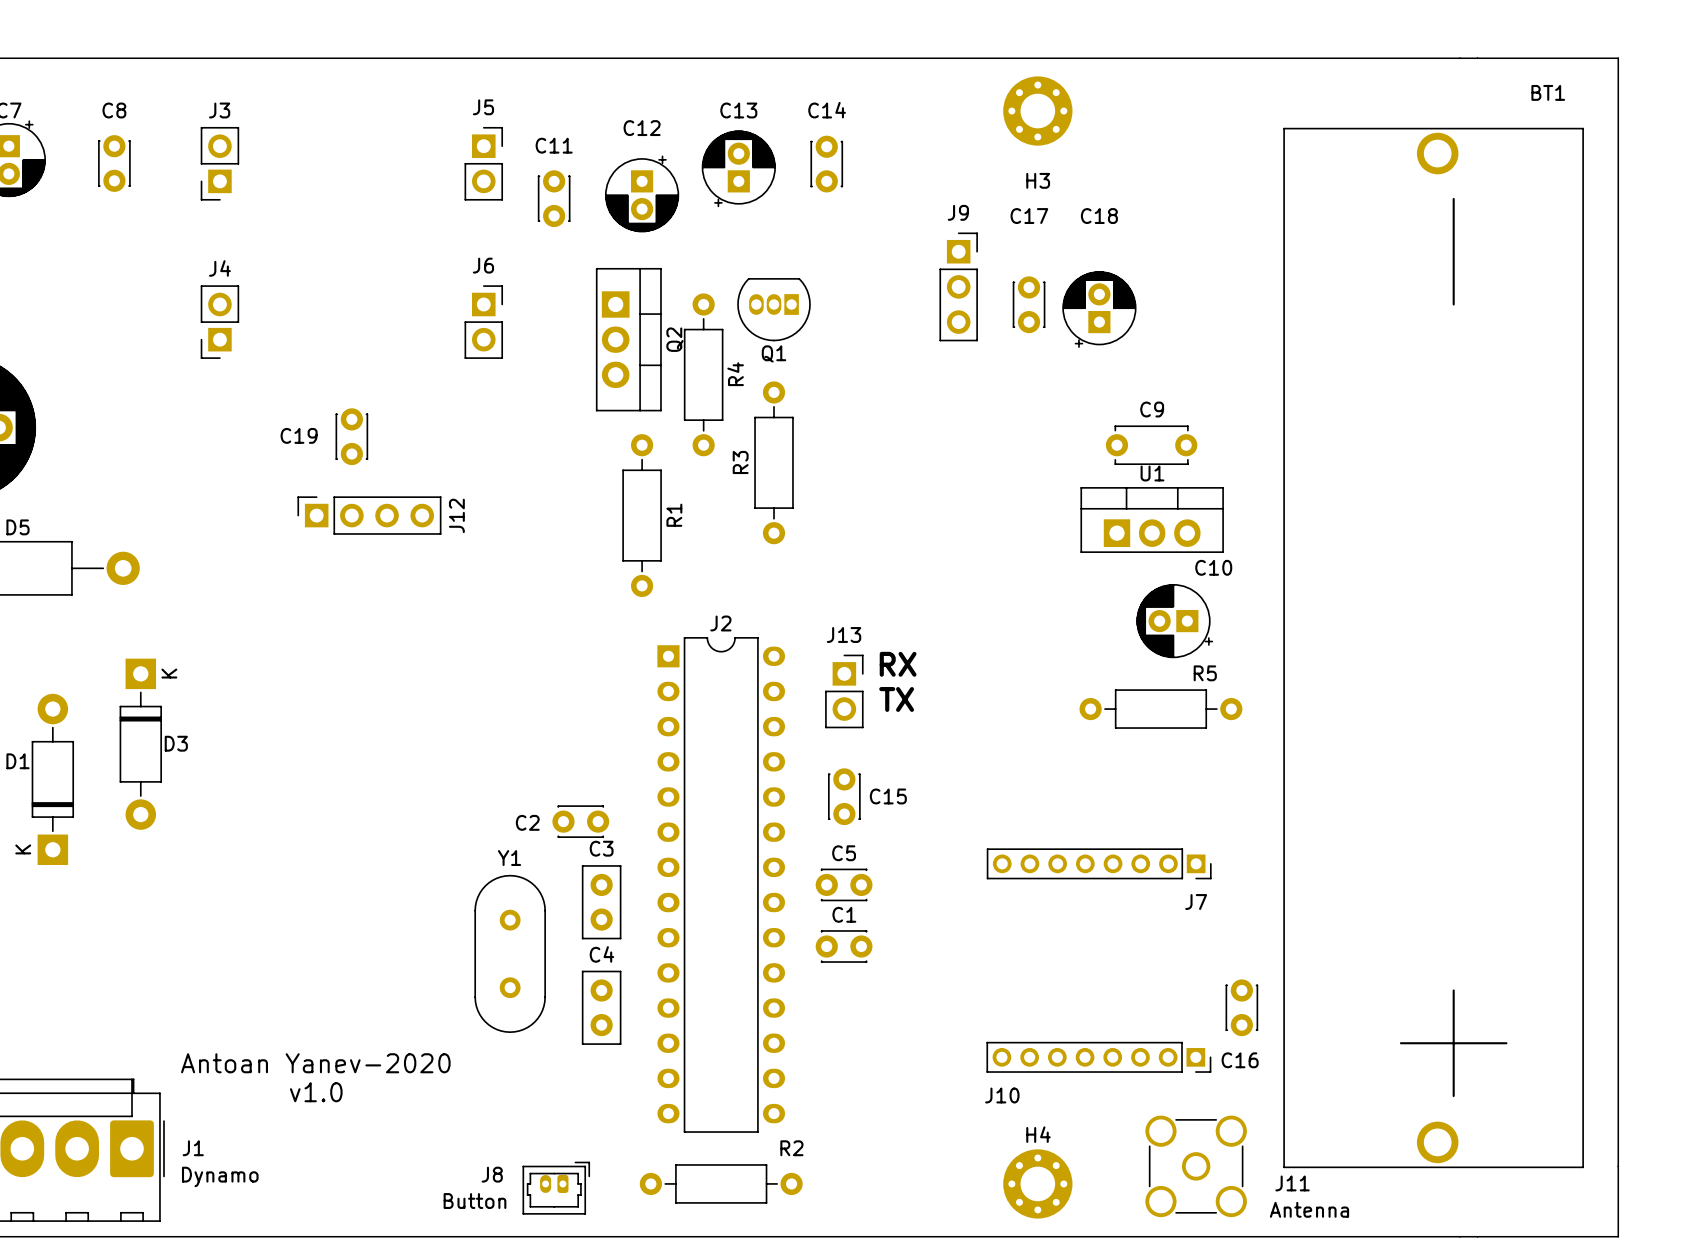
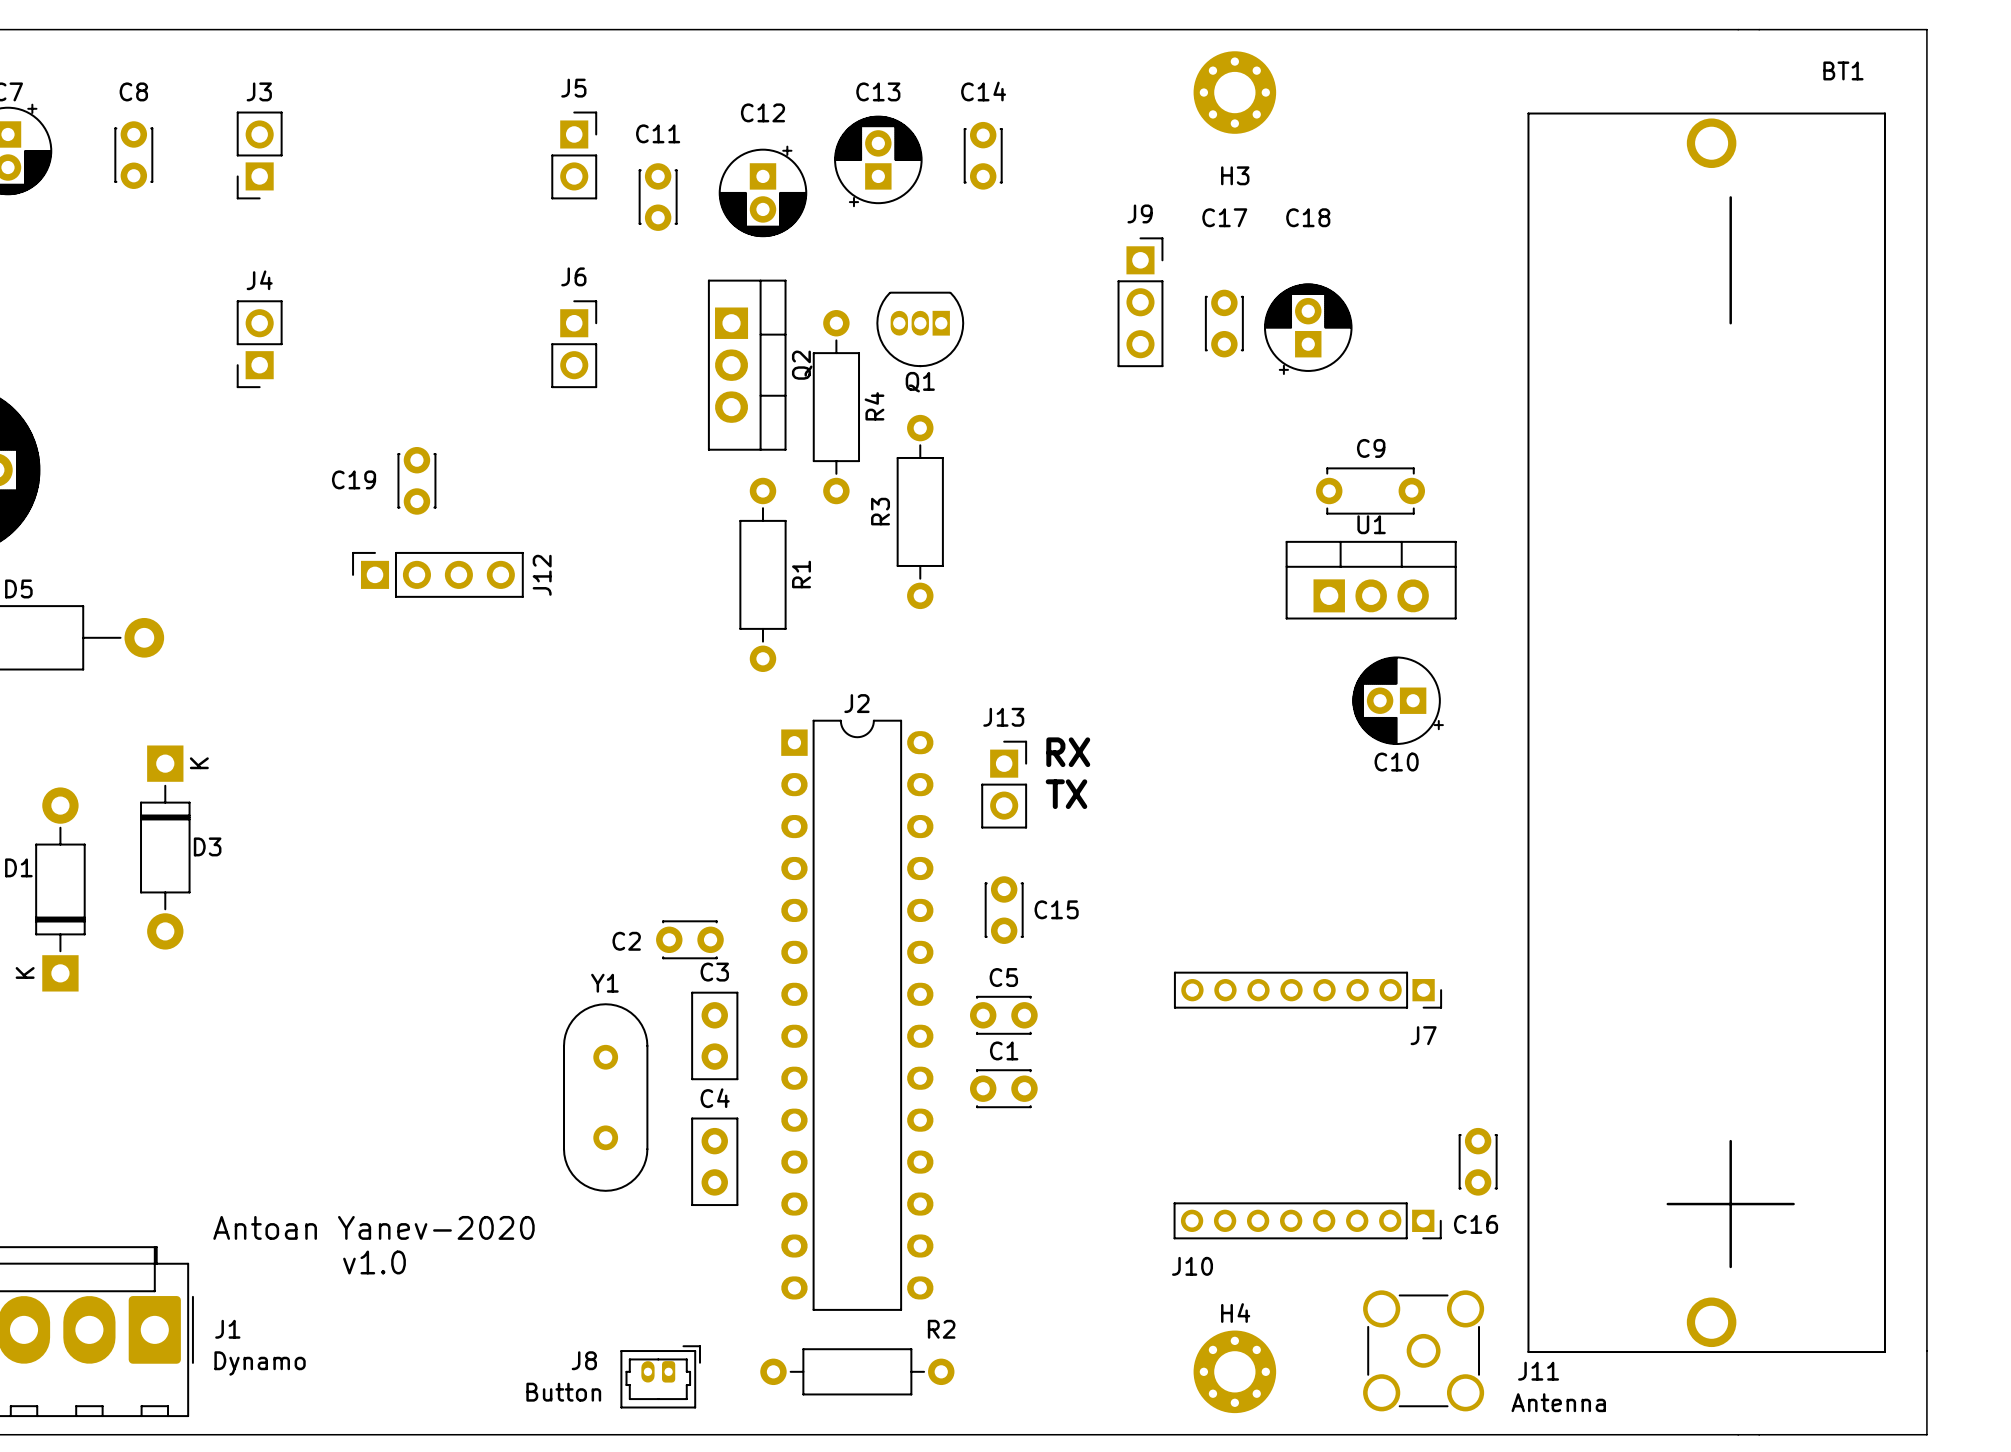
C10 name position: C10 (1213, 567) -> C10 (1396, 762)
R5: (1160, 709) -> none

